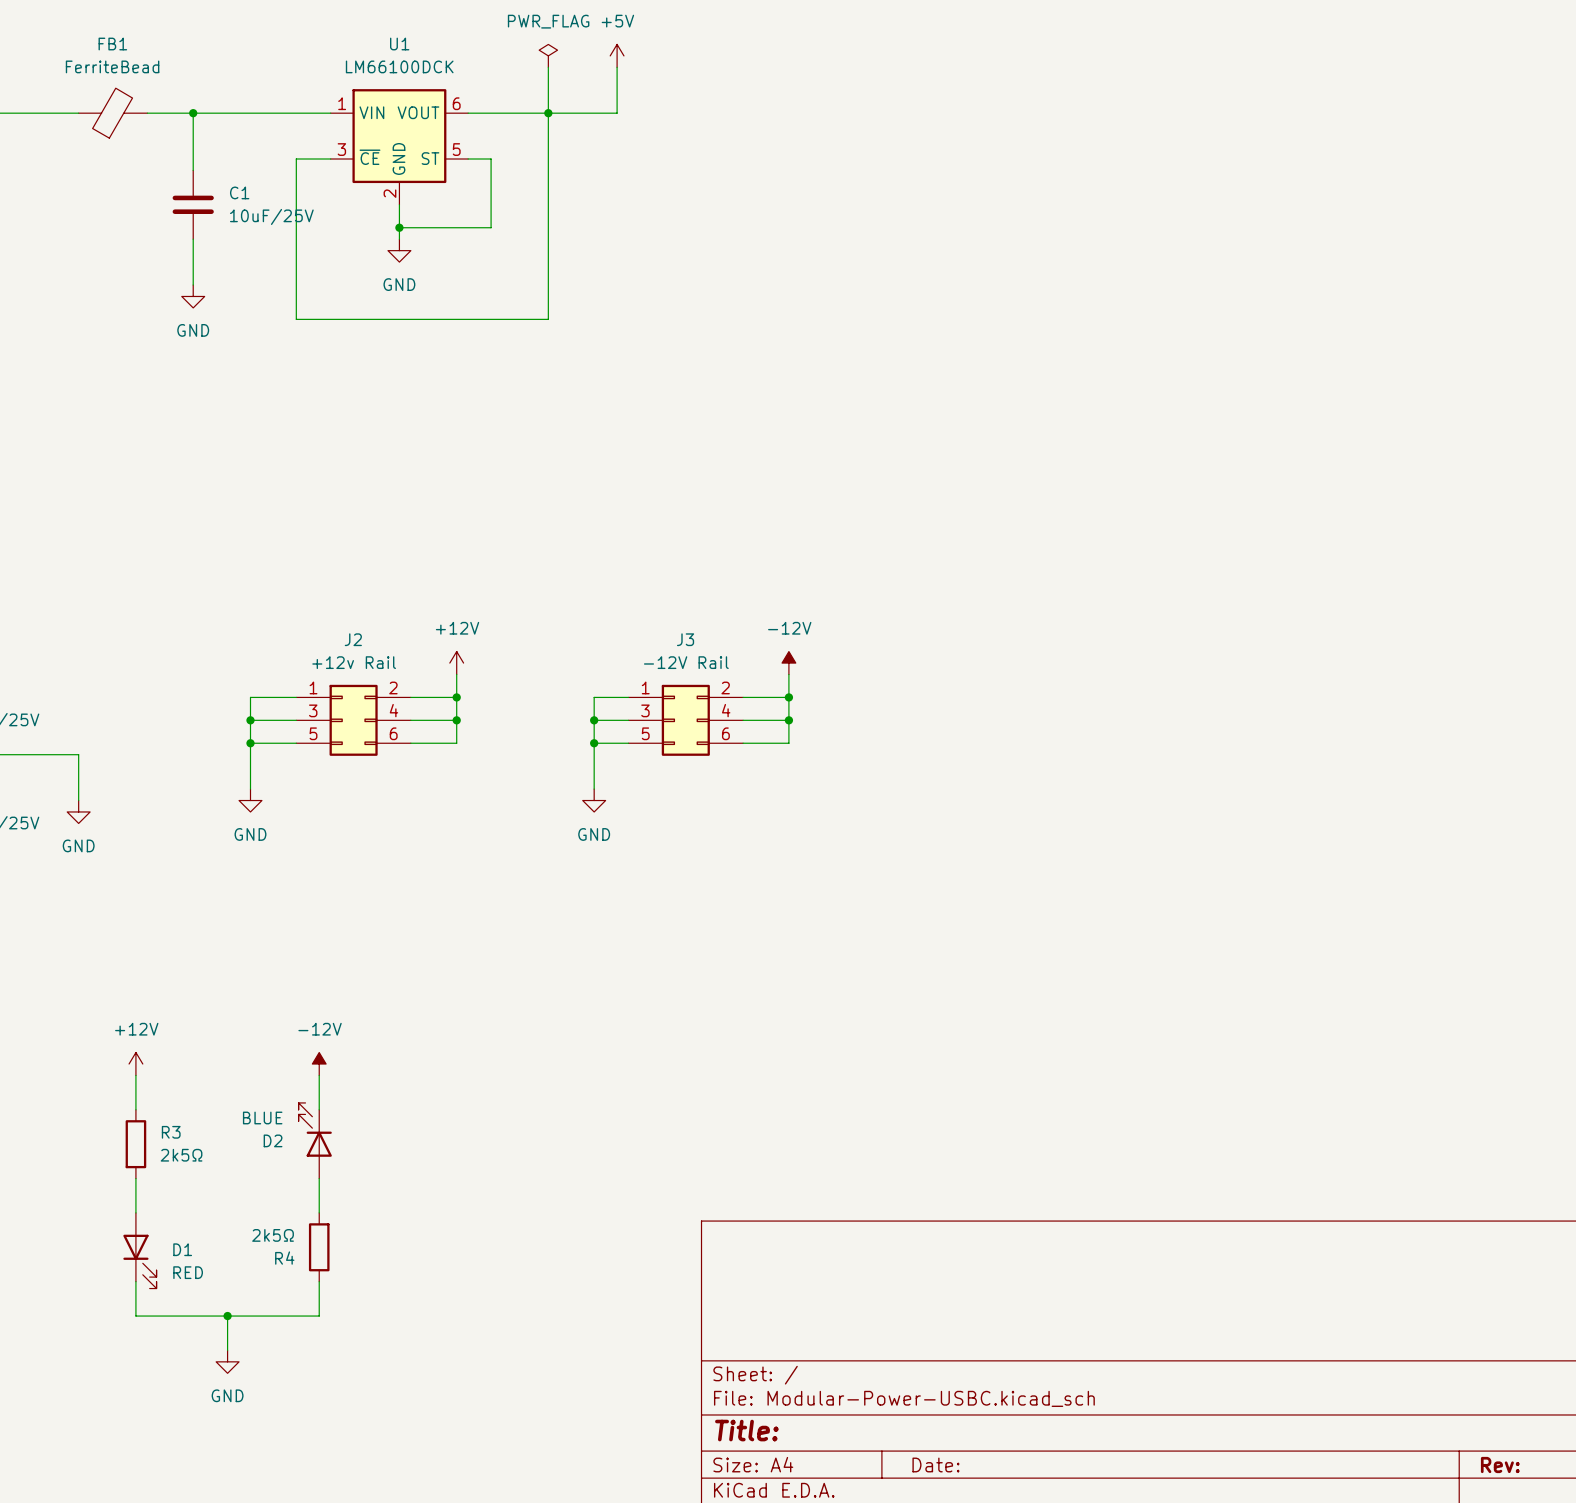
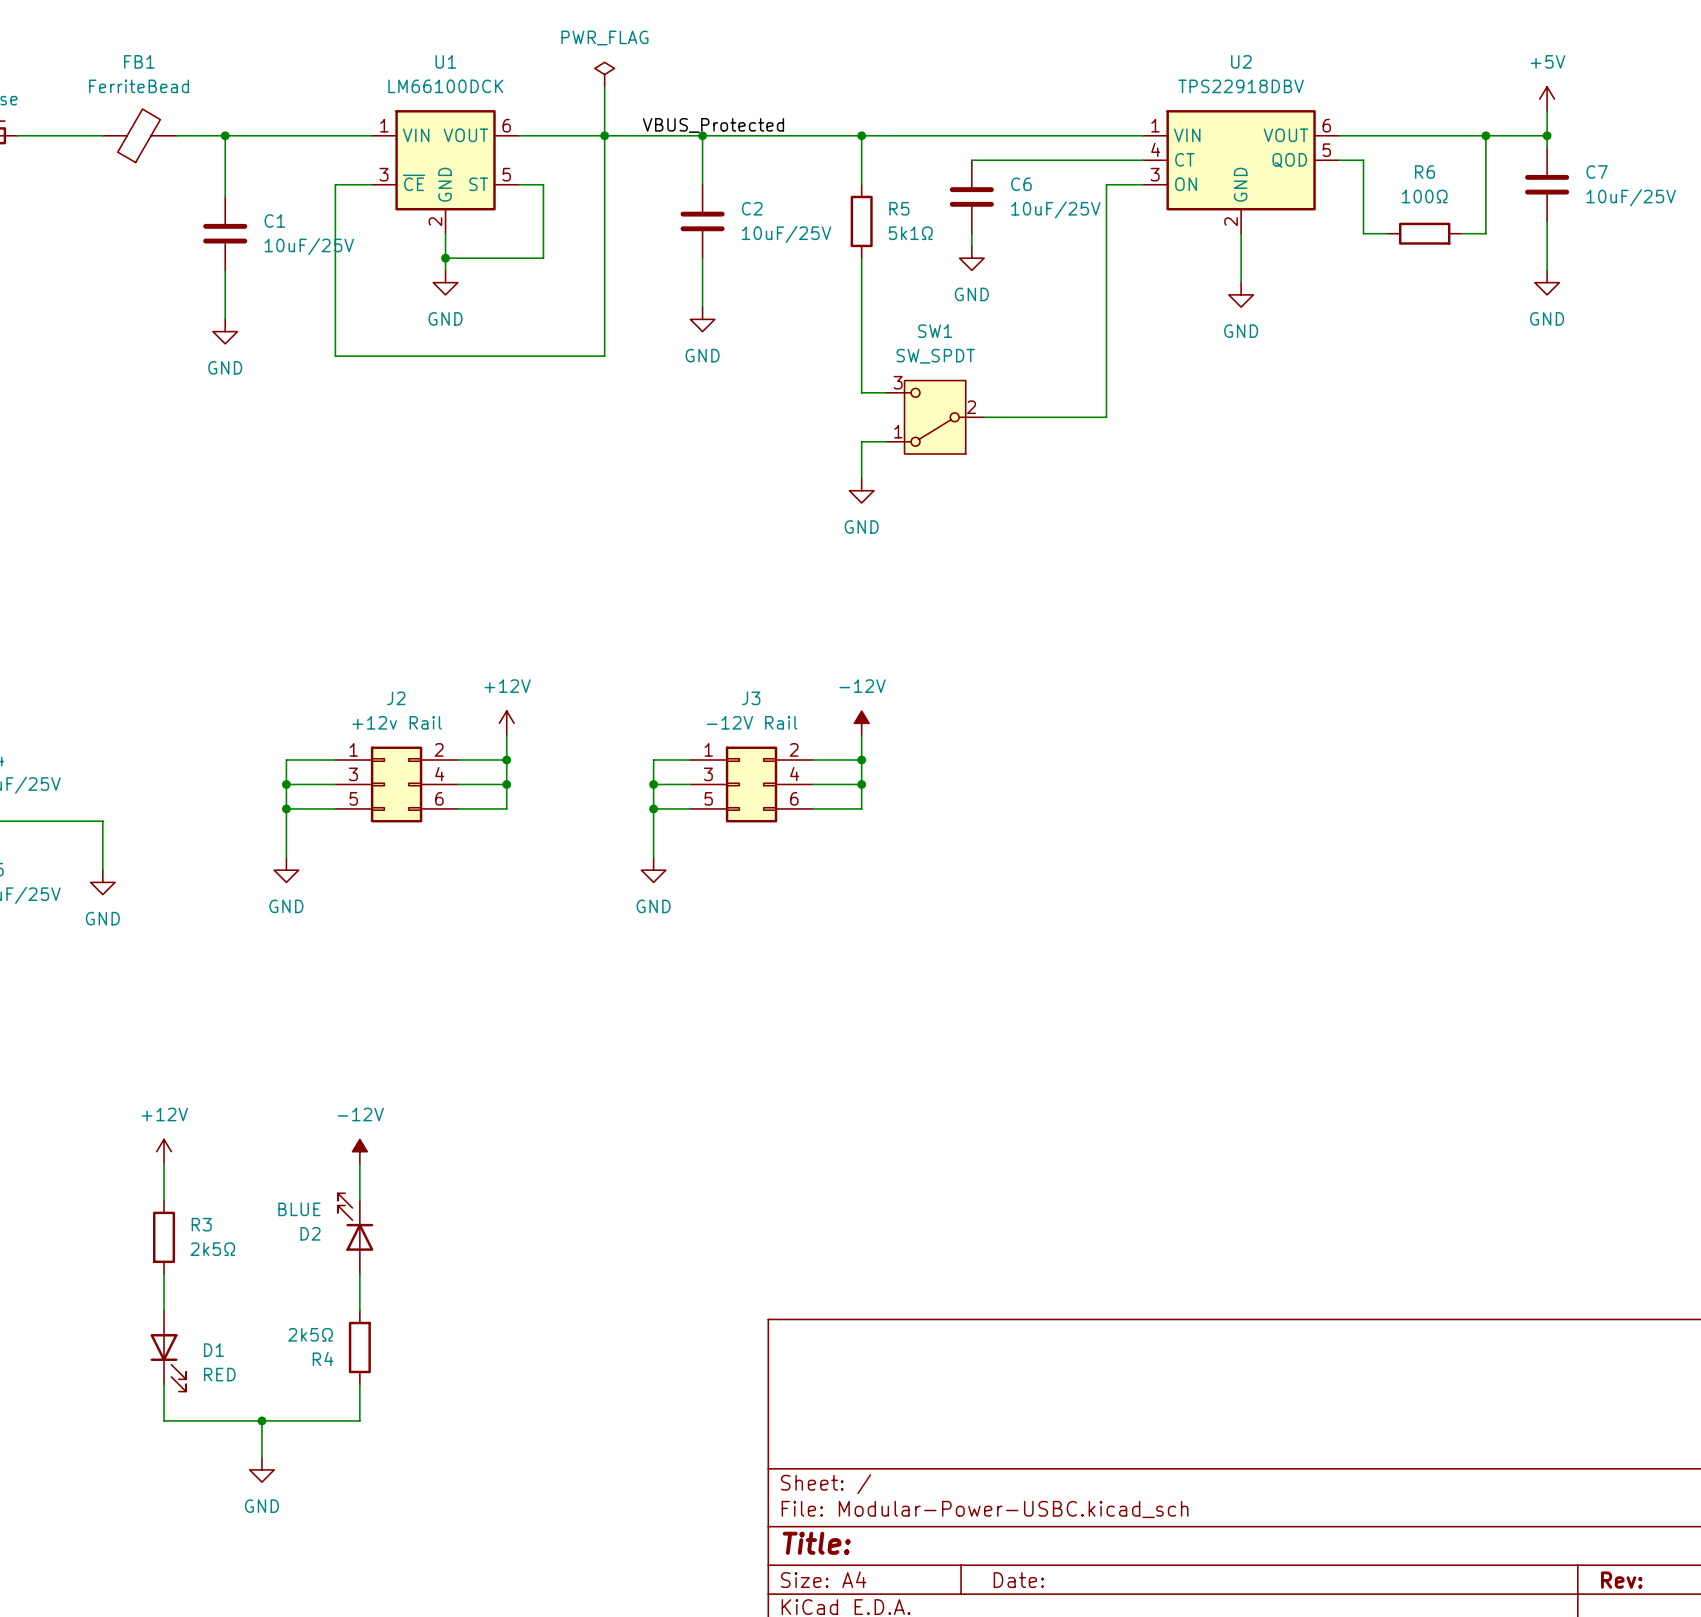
power symbol: +5V (617, 55) -> none
wire: (617, 67) (617, 113) -> (1143, 135) (678, 135)
power symbol: none -> +5V (1547, 99)
wire: none -> (1547, 111) (1547, 148)
label: none -> VBUS_Protected (713, 125)
wire: none -> (702, 135) (702, 184)
junction: none -> (702, 135)
wire: none -> (861, 135) (861, 184)
junction: none -> (861, 135)
wire: none -> (1339, 135) (1547, 135)
wire: none -> (1485, 135) (1485, 233) (1461, 233)
junction: none -> (1485, 135)
junction: none -> (1547, 135)
wire: none -> (971, 160) (1143, 160)
wire: none -> (1339, 160) (1363, 160) (1363, 233) (1387, 233)
U2: none -> TPS22918DBV (1241, 171)
wire: none -> (1143, 184) (1106, 184) (1106, 417) (984, 417)
C7: none -> 10uF/25V (1547, 184)
C6: none -> 10uF/25V (971, 196)
C2: none -> 10uF/25V (702, 221)
R5: none -> 5k1Ω (861, 221)
wire: none -> (1547, 221) (1547, 270)
wire: none -> (971, 233) (971, 245)
wire: none -> (1241, 233) (1241, 282)
R6: none -> 100Ω (1424, 233)
wire: none -> (702, 258) (702, 307)
wire: none -> (861, 258) (861, 392) (886, 392)
power symbol: none -> GND (971, 258)
power symbol: none -> GND (1547, 282)
power symbol: none -> GND (1241, 294)
power symbol: none -> GND (702, 319)
SW1: none -> SW_SPDT (935, 417)
wire: none -> (886, 441) (861, 441) (861, 478)
power symbol: none -> GND (861, 490)

